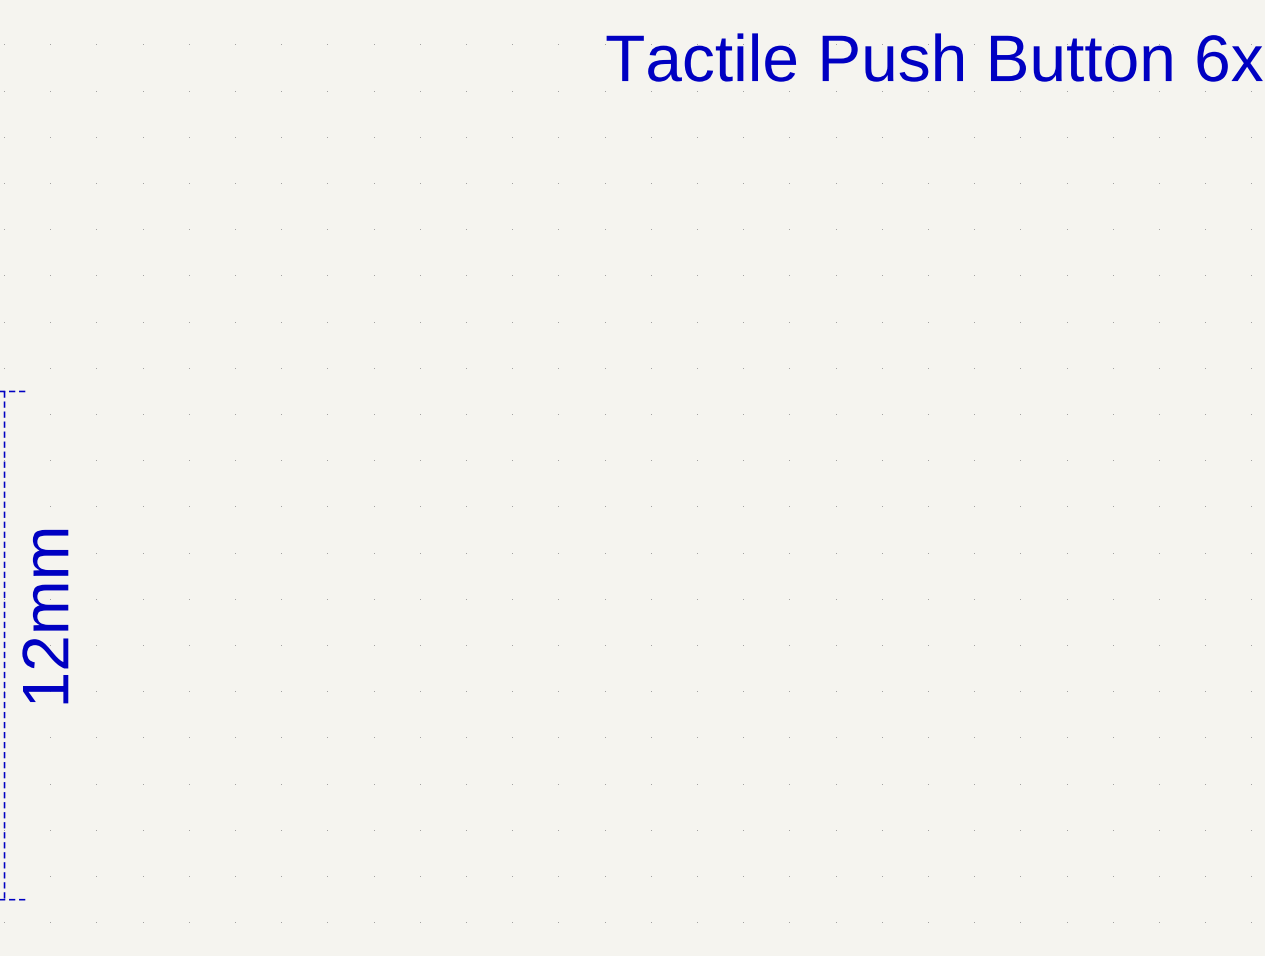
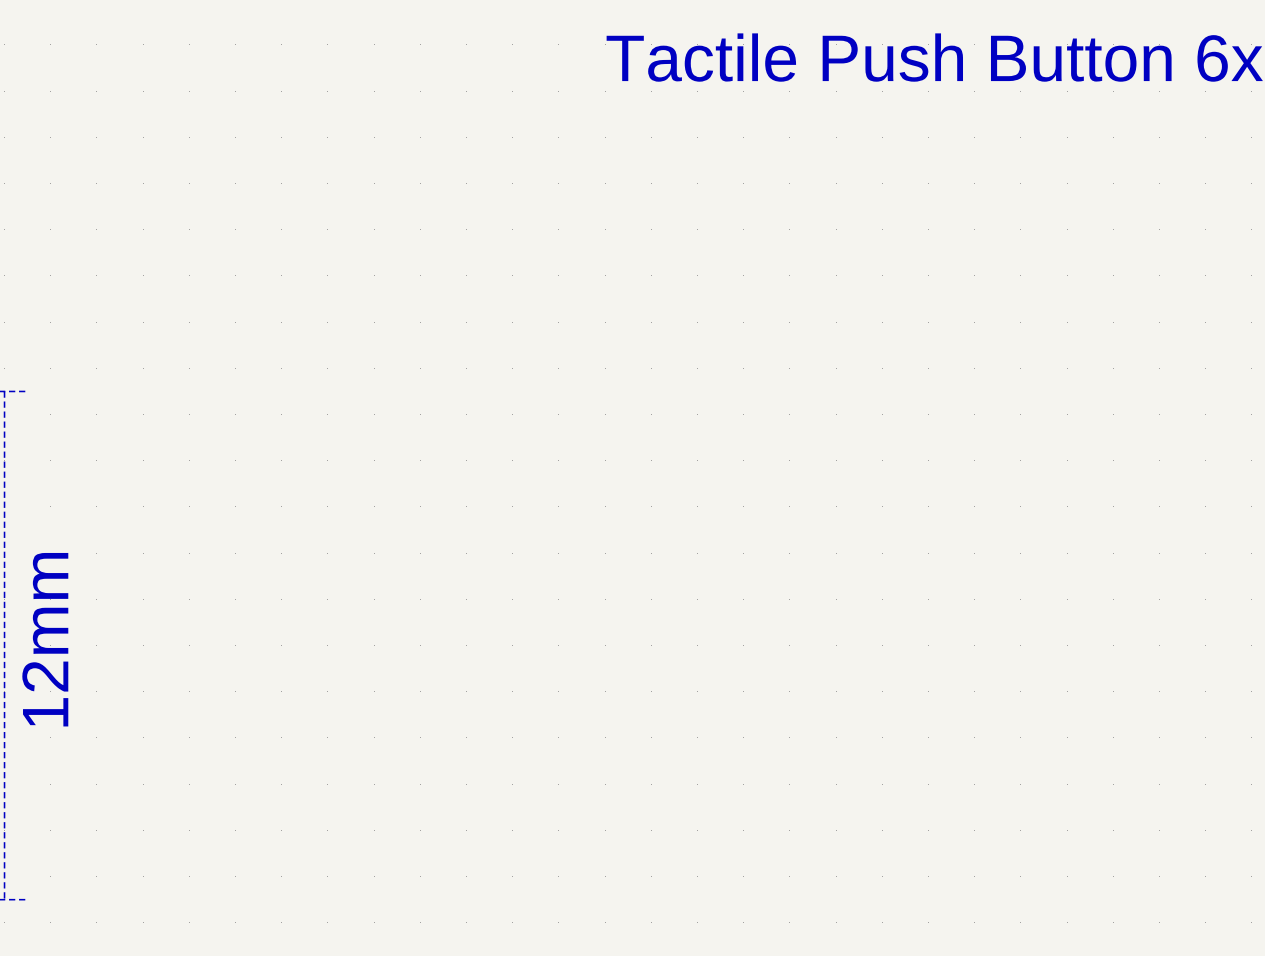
text position: 12mm (45, 616) -> 12mm (45, 639)

